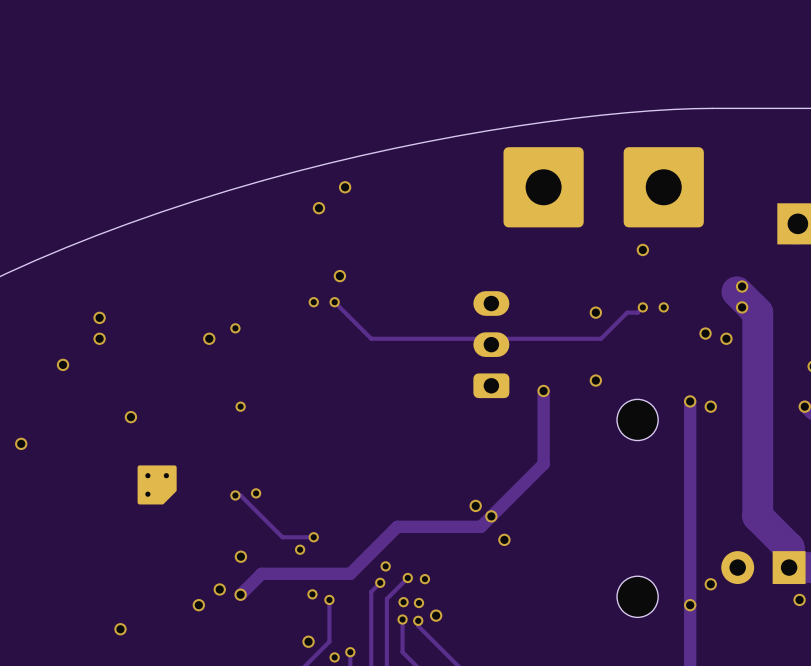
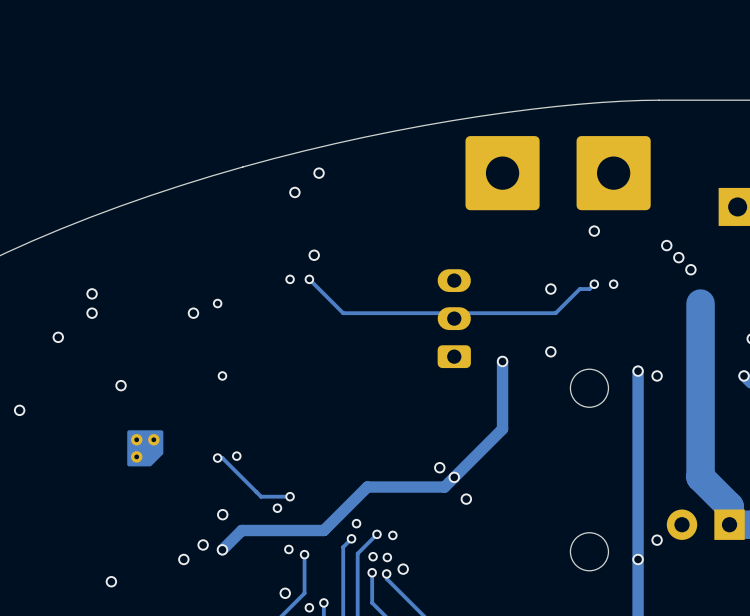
via: none -> (666, 245)
via: none -> (678, 257)
via: (742, 286) -> none
track: (736, 291) (757, 312) (757, 328) -> none
via: none -> (690, 269)
via: (742, 307) -> none
via: (705, 333) -> none
via: (726, 338) -> none
via: (799, 599) -> none

